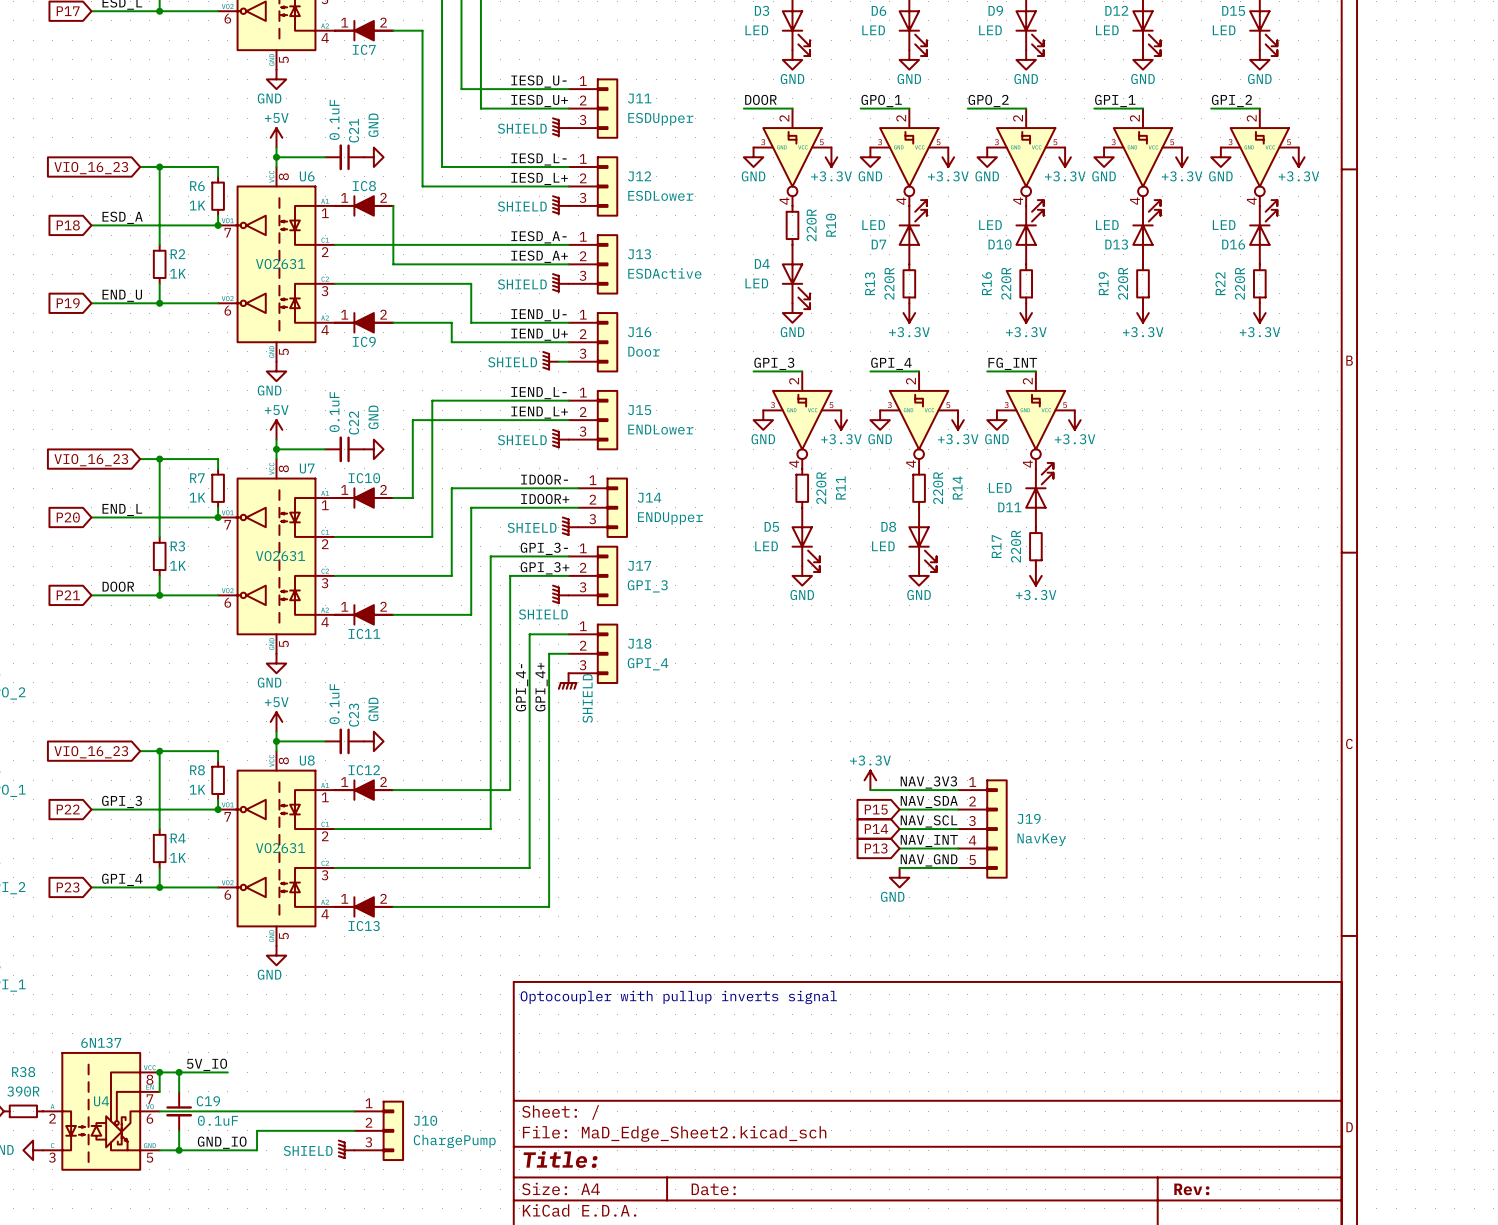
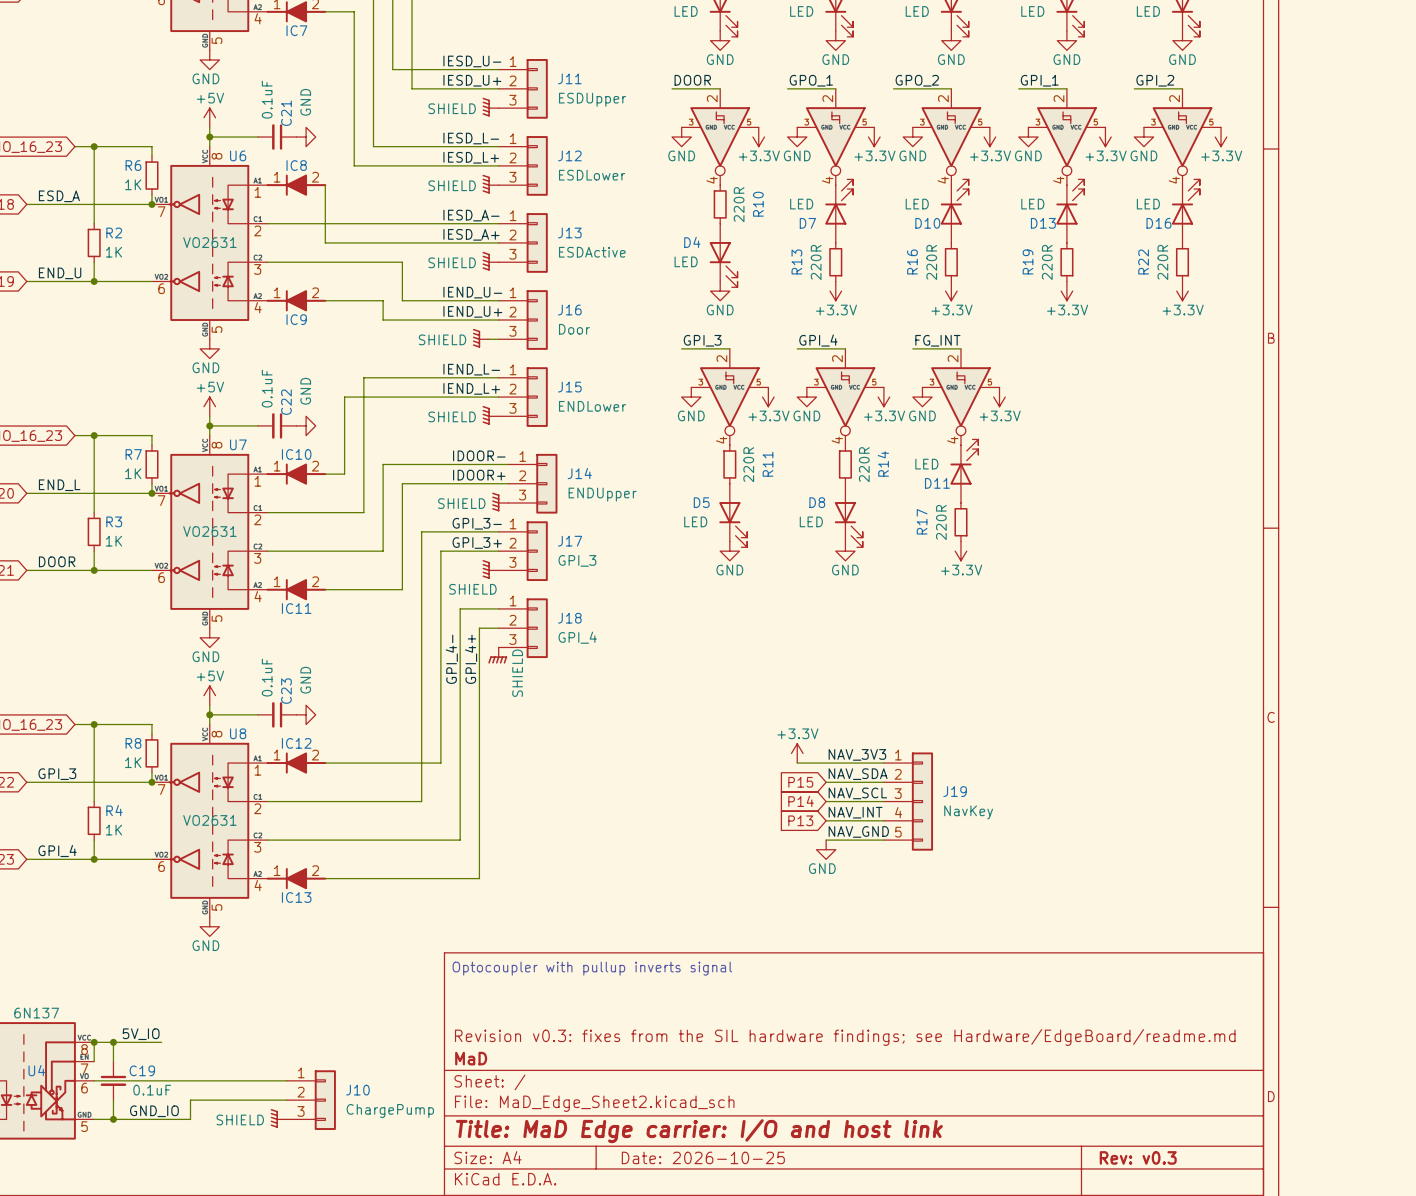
title block: none -> Revision v0.3: fixes from the SIL hardware findings; see Hardware/EdgeBoard/readme.md (845, 1037)
title block: none -> MaD (471, 1058)
title block: Title: (560, 1159) -> Title: MaD Edge carrier: I/O and host link (699, 1131)
title block: Date: (713, 1189) -> Date: 2026-10-25 (703, 1157)
title block: Rev: (1191, 1189) -> Rev: v0.3 (1138, 1157)

